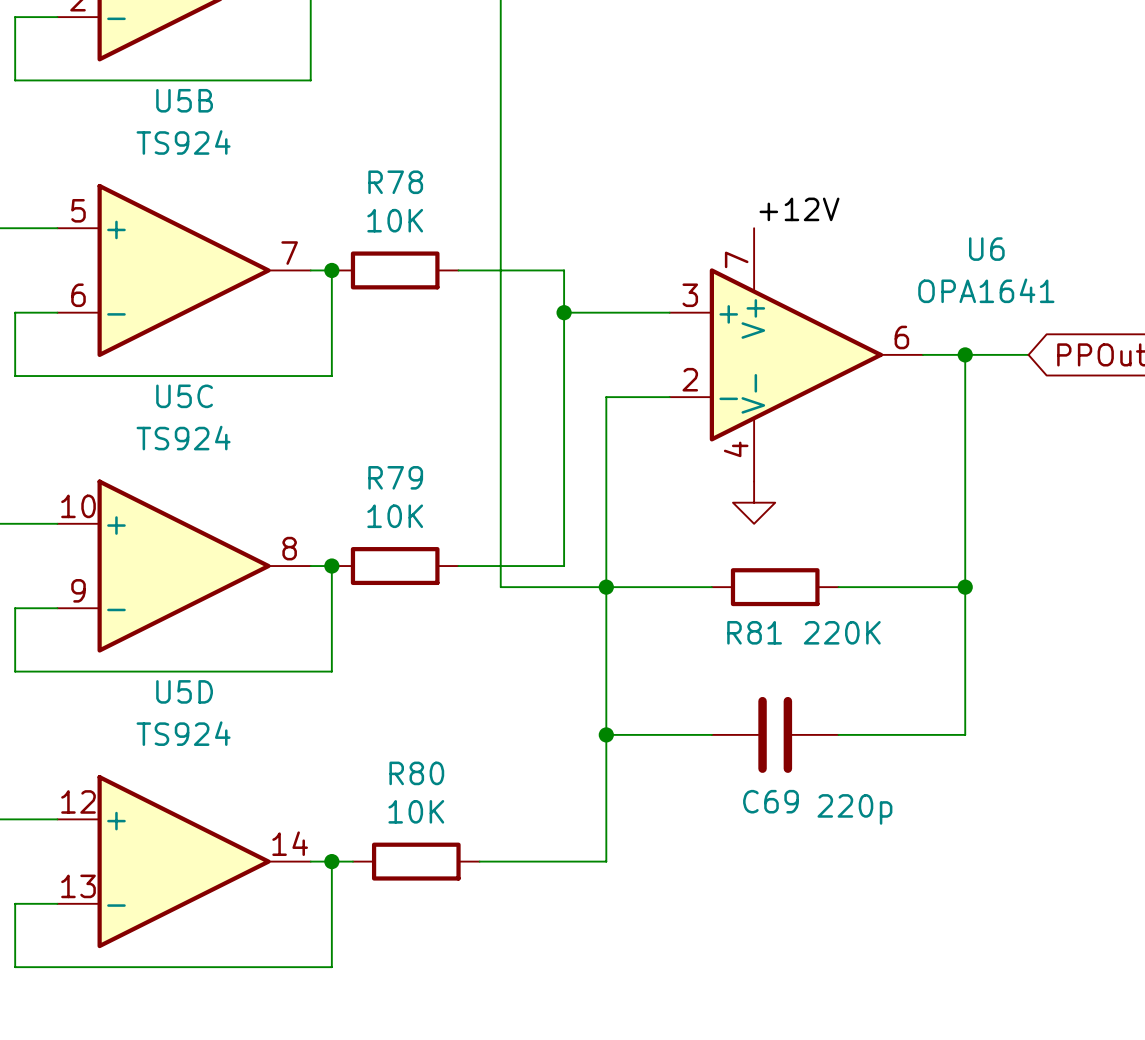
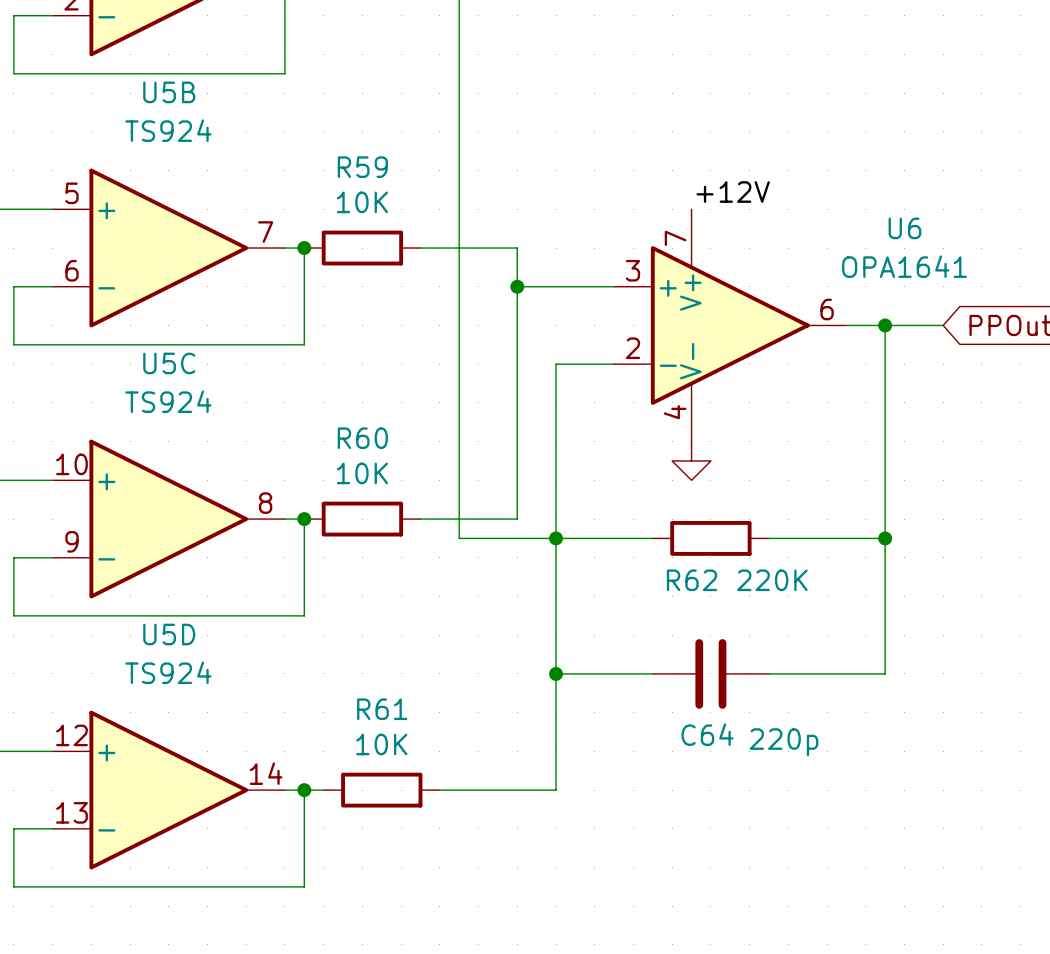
R78 name: R78 (395, 182) -> R59 (362, 167)
R79 name: R79 (395, 477) -> R60 (362, 438)
R81 name: R81 (754, 632) -> R62 (691, 580)
R80 name: R80 (416, 773) -> R61 (382, 709)
C69 name: C69 (770, 801) -> C64 (707, 734)

